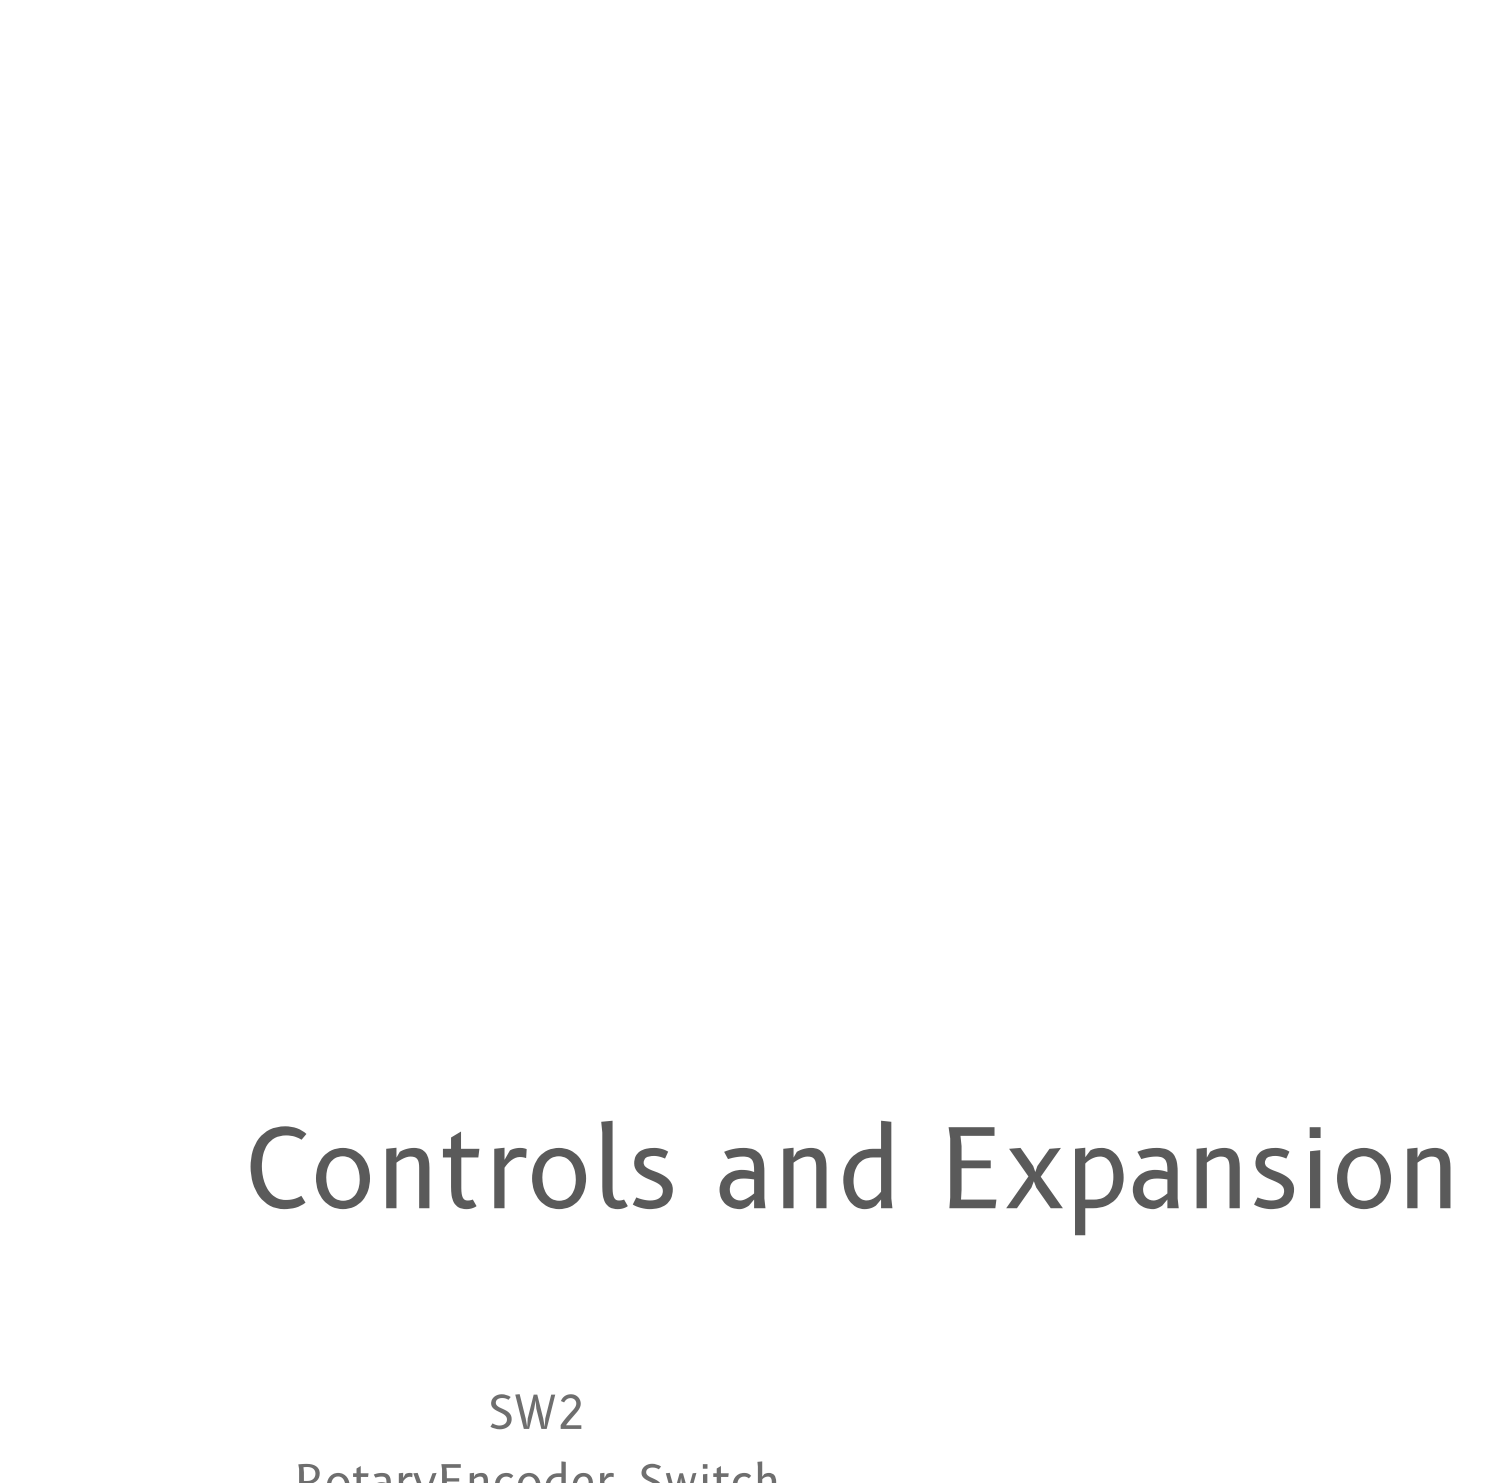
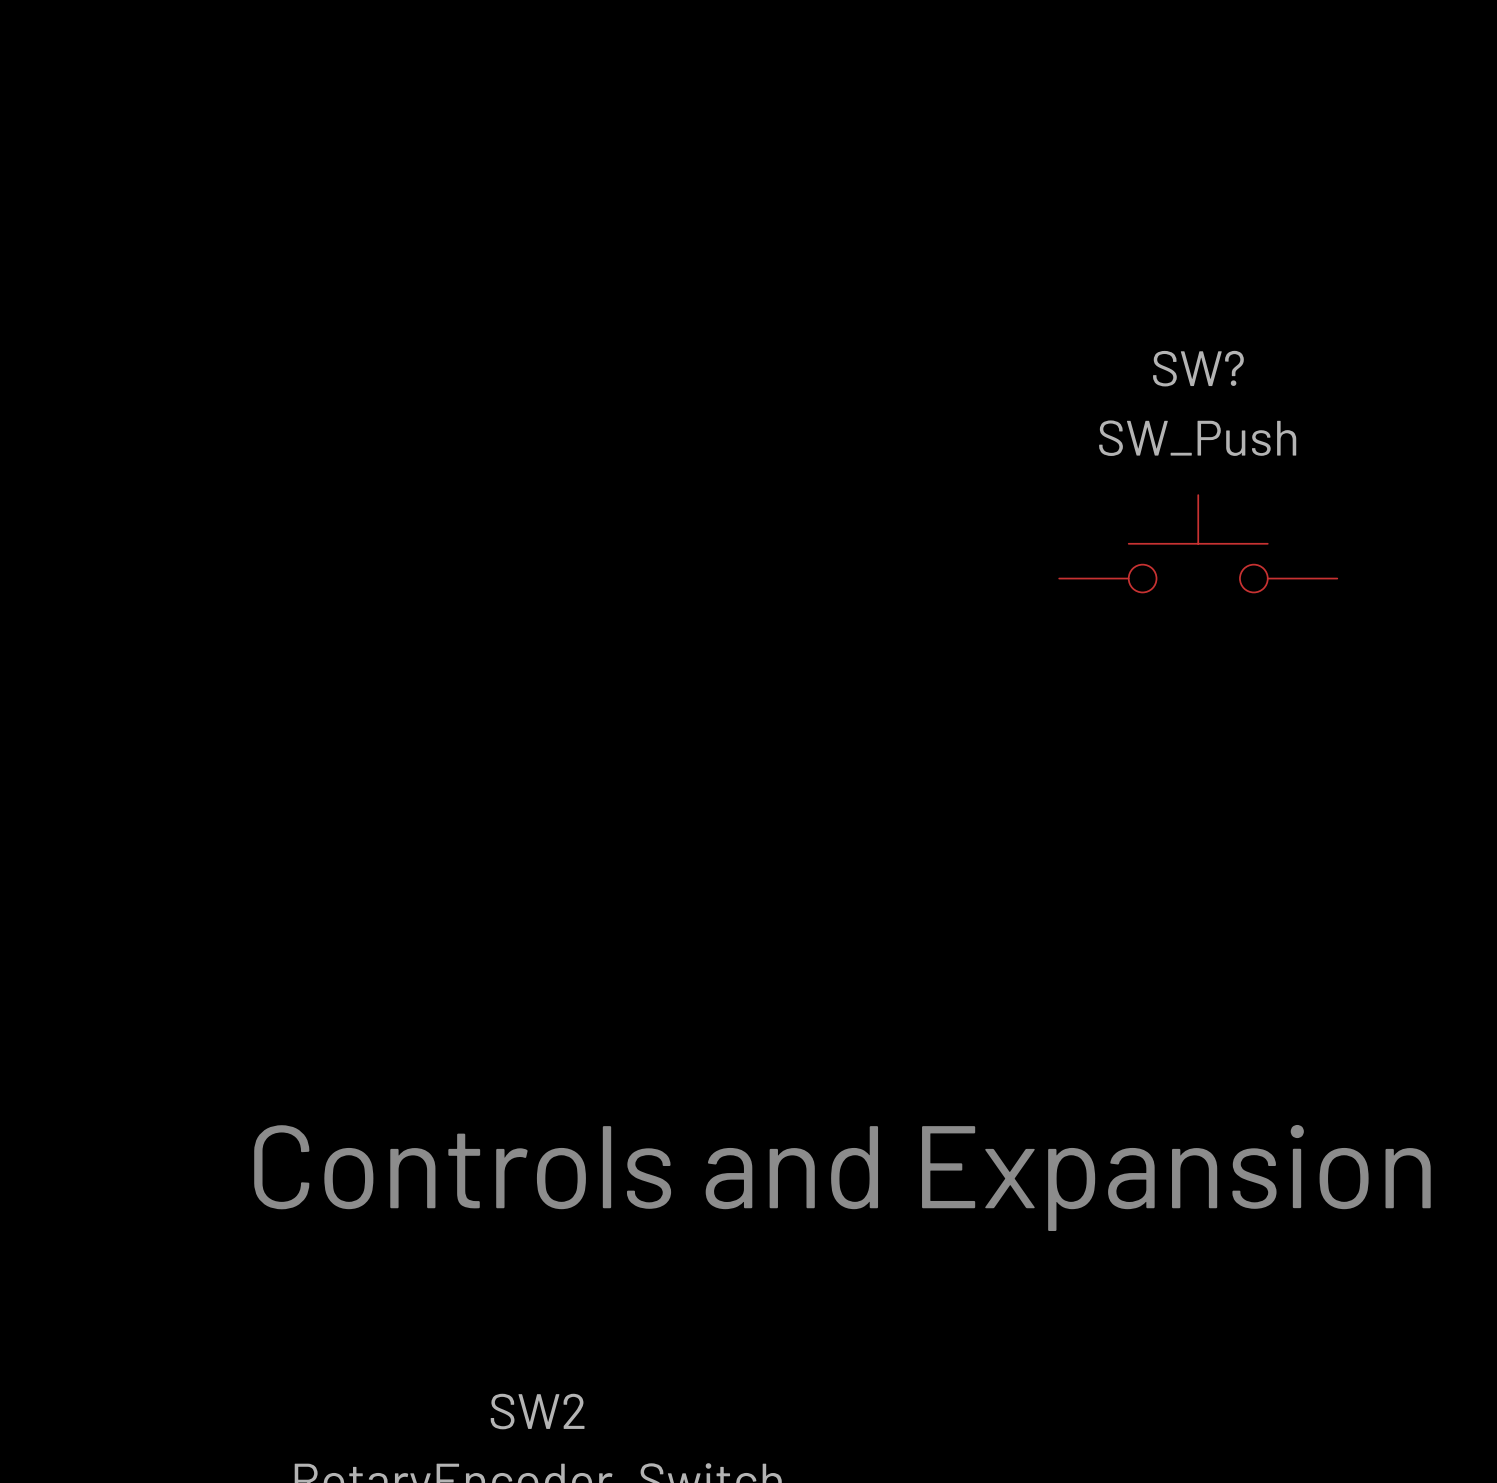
SW?: none -> SW_Push (1198, 543)

